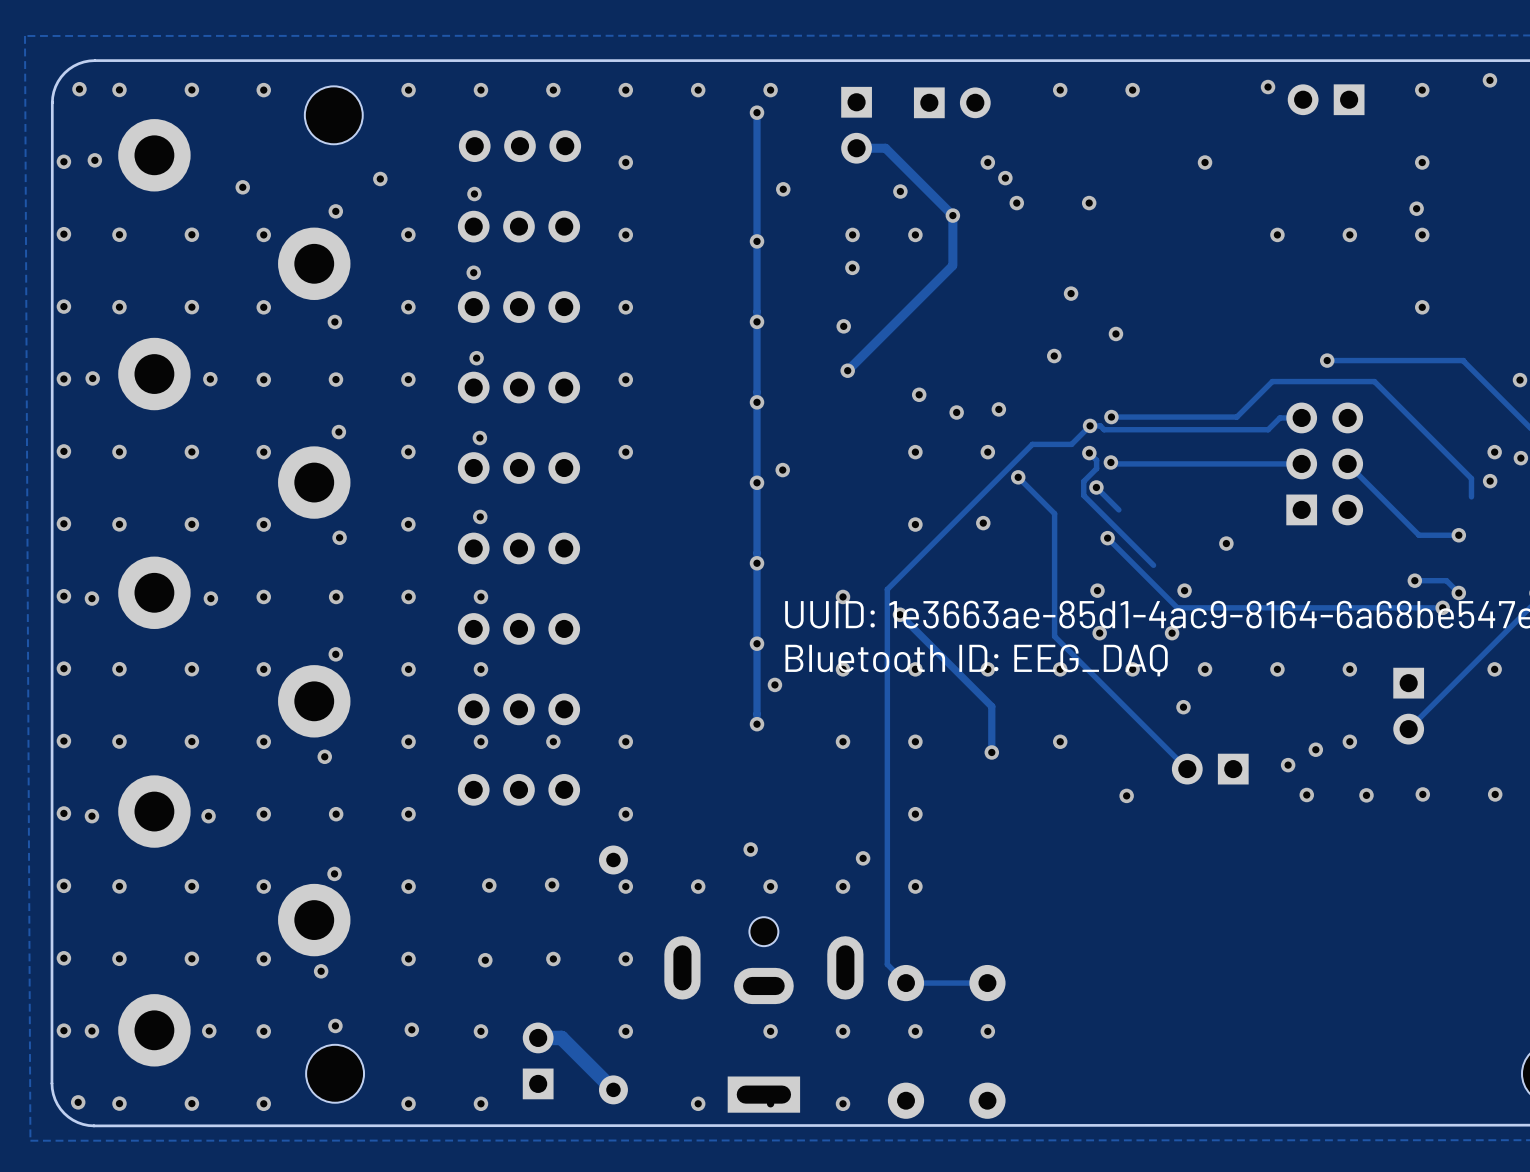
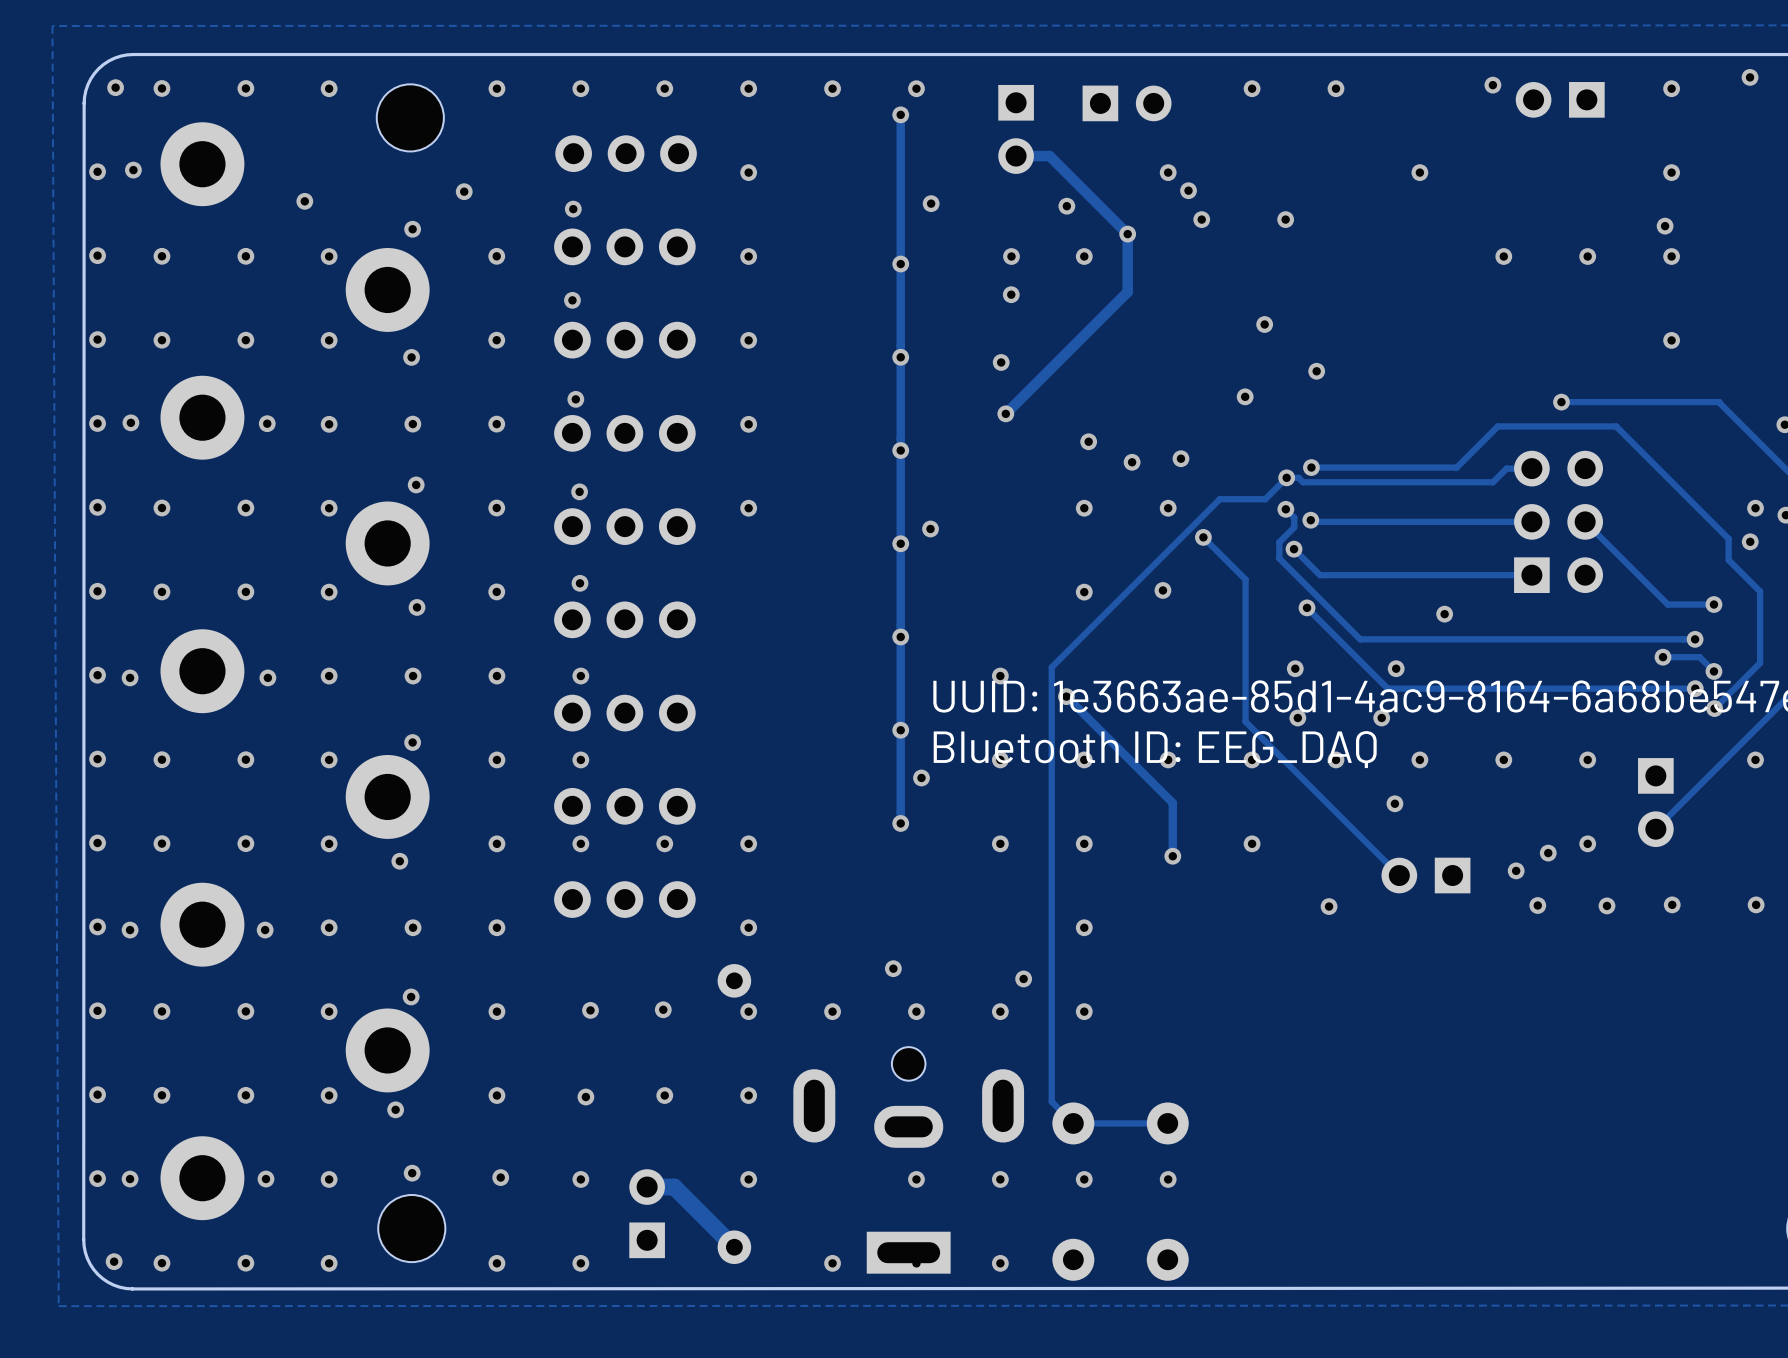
track: none -> (1728, 560) (1760, 591) (1760, 663) (1714, 708)
track: none -> (1531, 575) (1320, 575)
track: none -> (1695, 639) (1360, 639)
via: none -> (1695, 639)
via: none -> (1714, 708)

